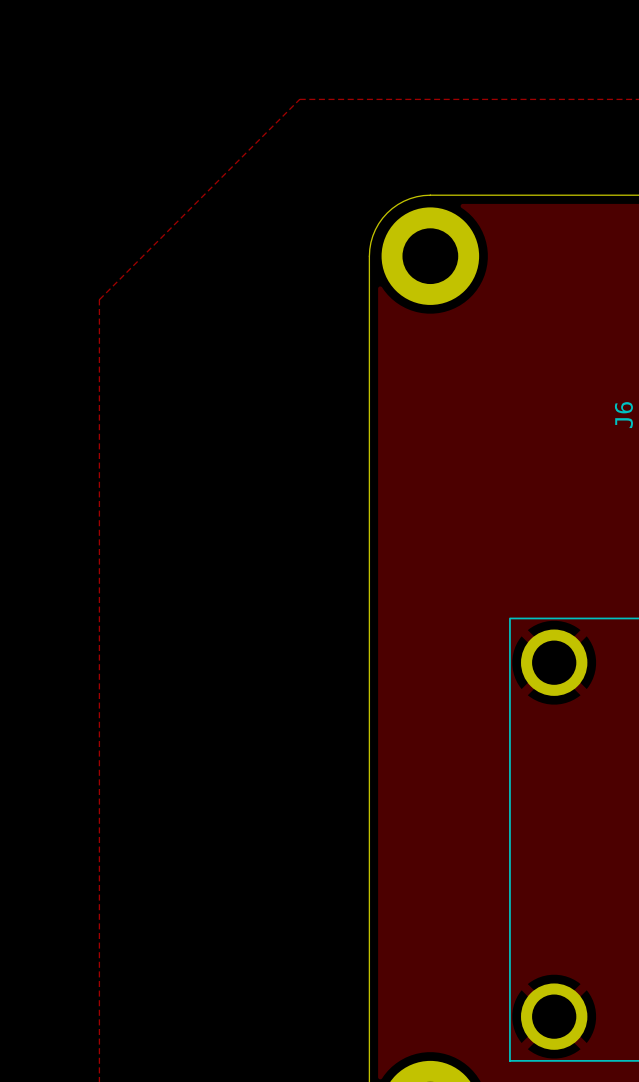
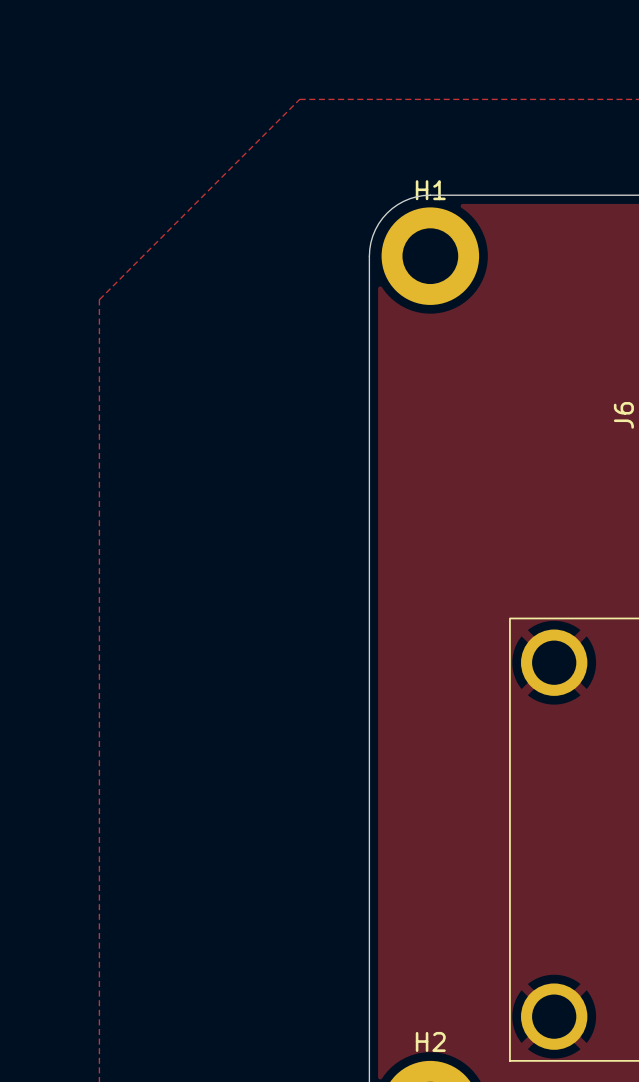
H1 name: none -> H1 (430, 190)
H2 name: none -> H2 (430, 1041)

